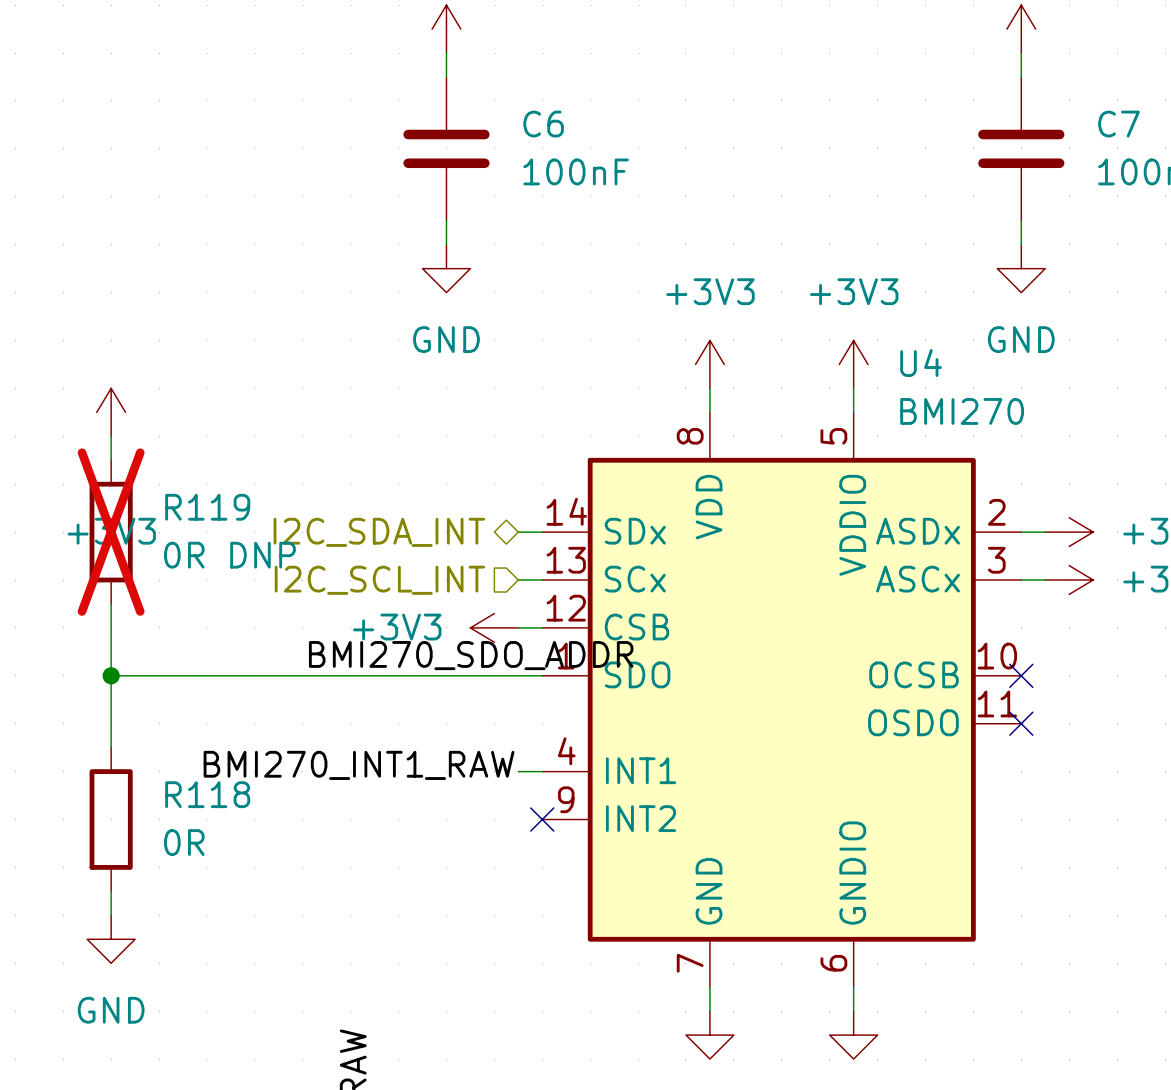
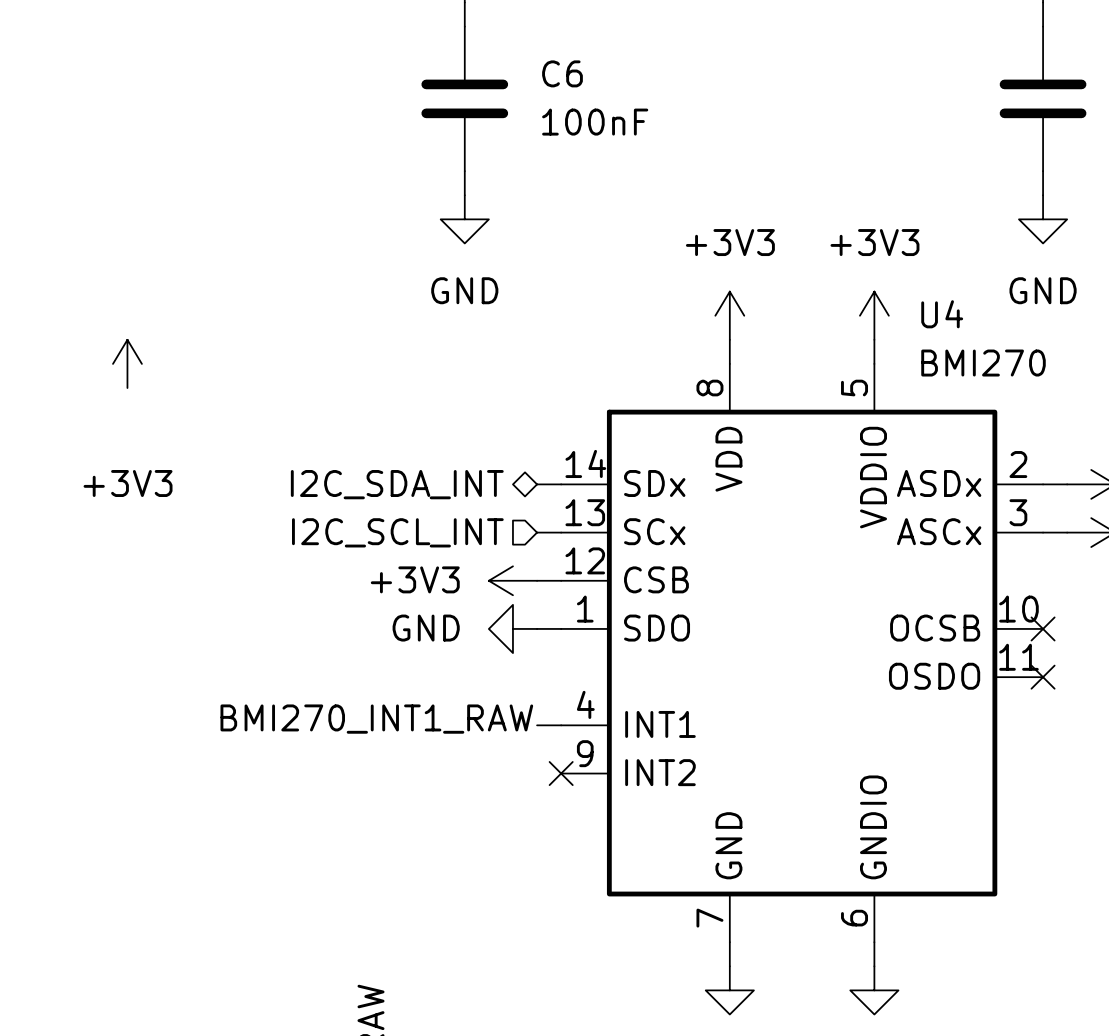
wire: (111, 436) (111, 460) -> none
R119: 0R DNP (111, 532) -> none
wire: (111, 603) (111, 747) -> none
label: BMI270_SDO_ADDR (471, 655) -> none
wire: (111, 675) (518, 675) -> none
junction: (111, 675) -> none
R118: 0R (111, 819) -> none
wire: (111, 891) (111, 915) -> none
power symbol rotation: 0° (111, 939) -> 90° clockwise (512, 628)
power symbol position: GND (111, 939) -> GND (512, 628)

